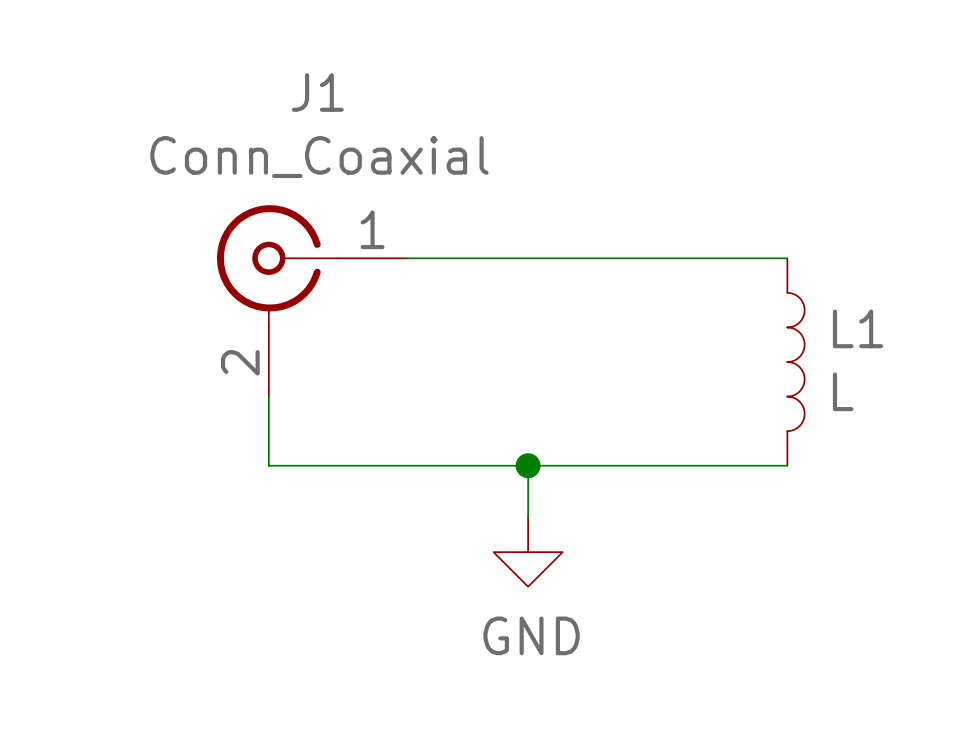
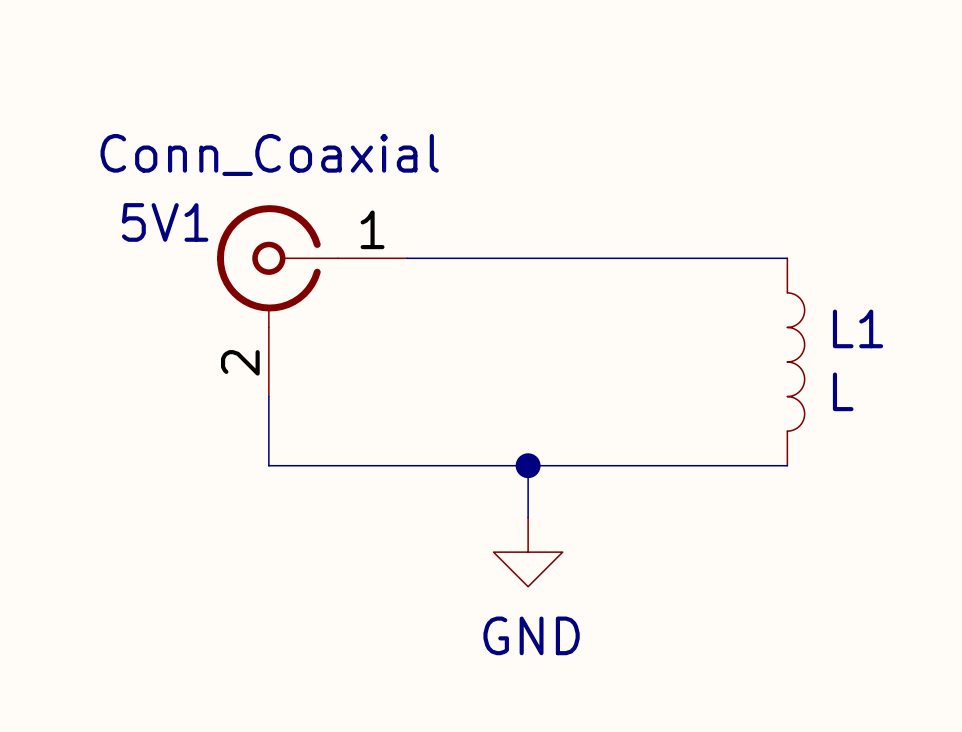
J1 name: J1 (317, 92) -> 5V1 (165, 222)
J1 value position: Conn_Coaxial (319, 157) -> Conn_Coaxial (269, 154)

